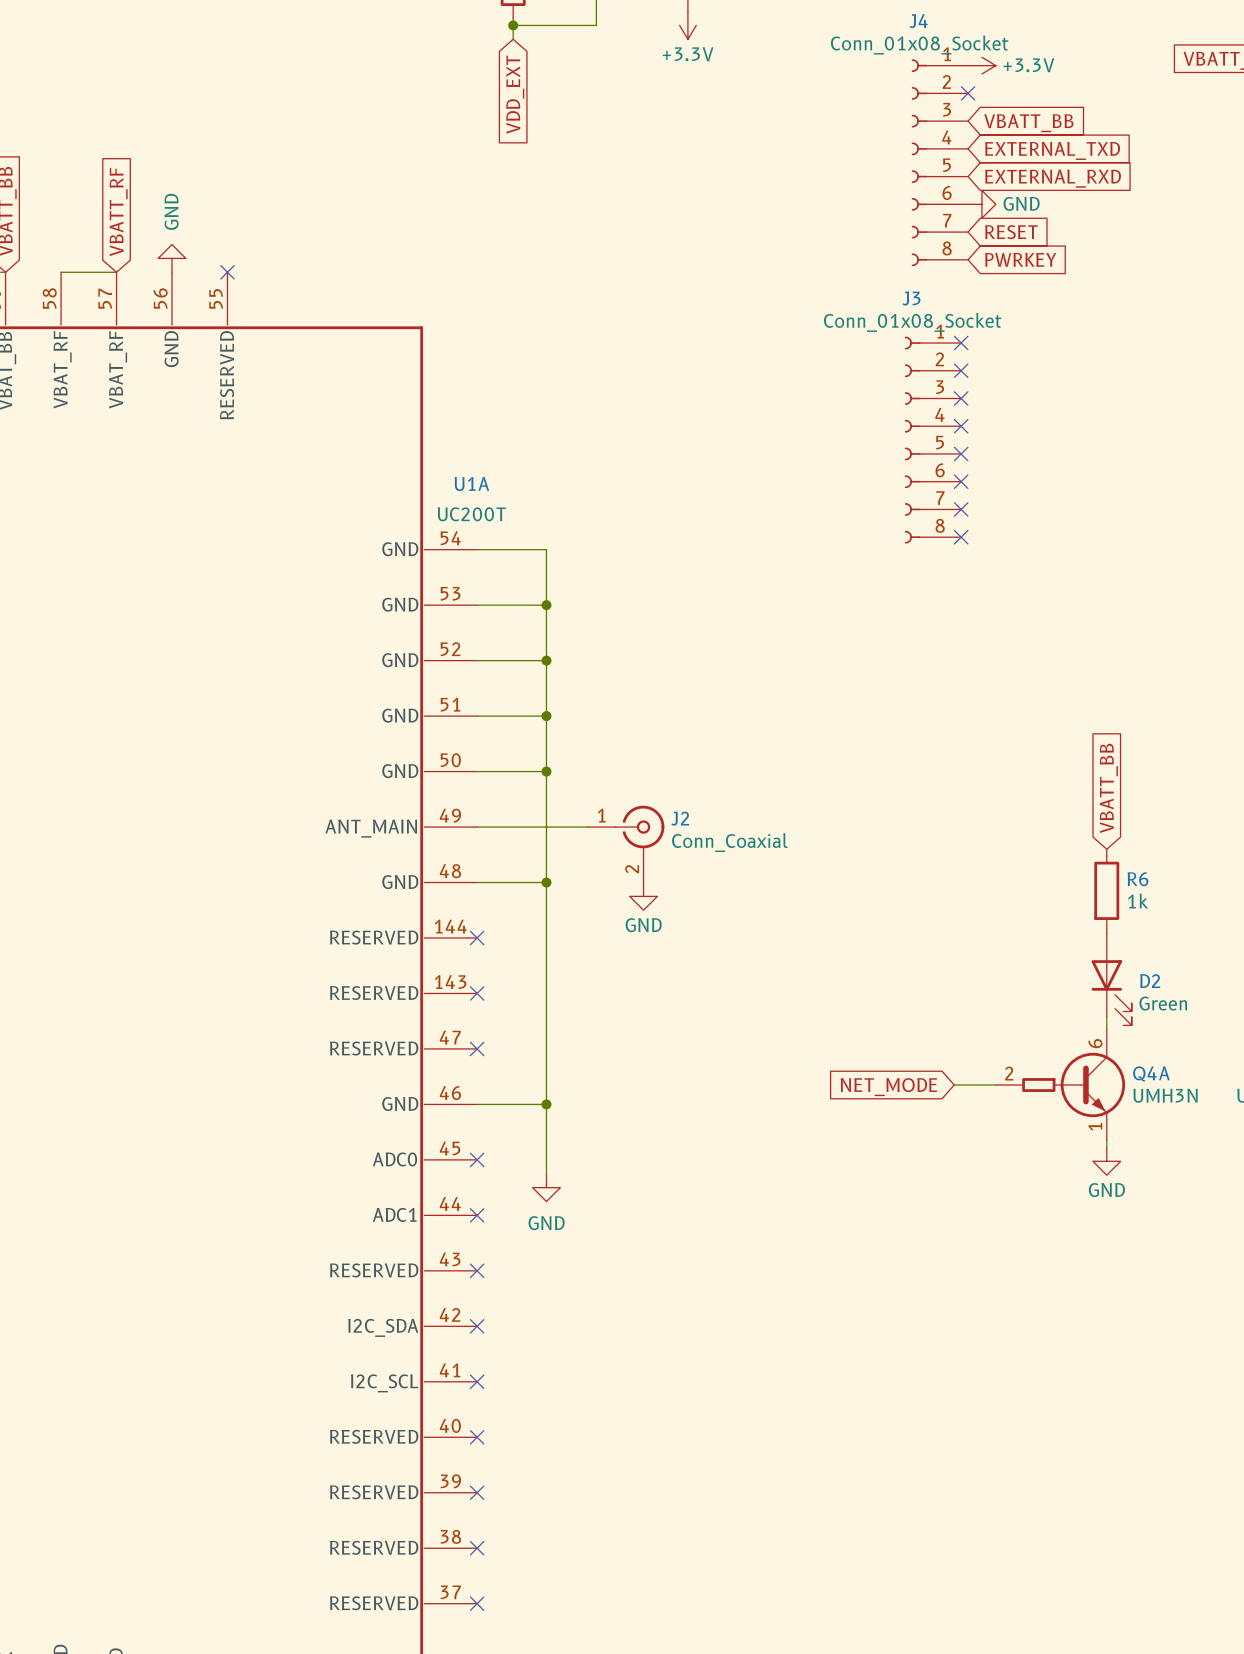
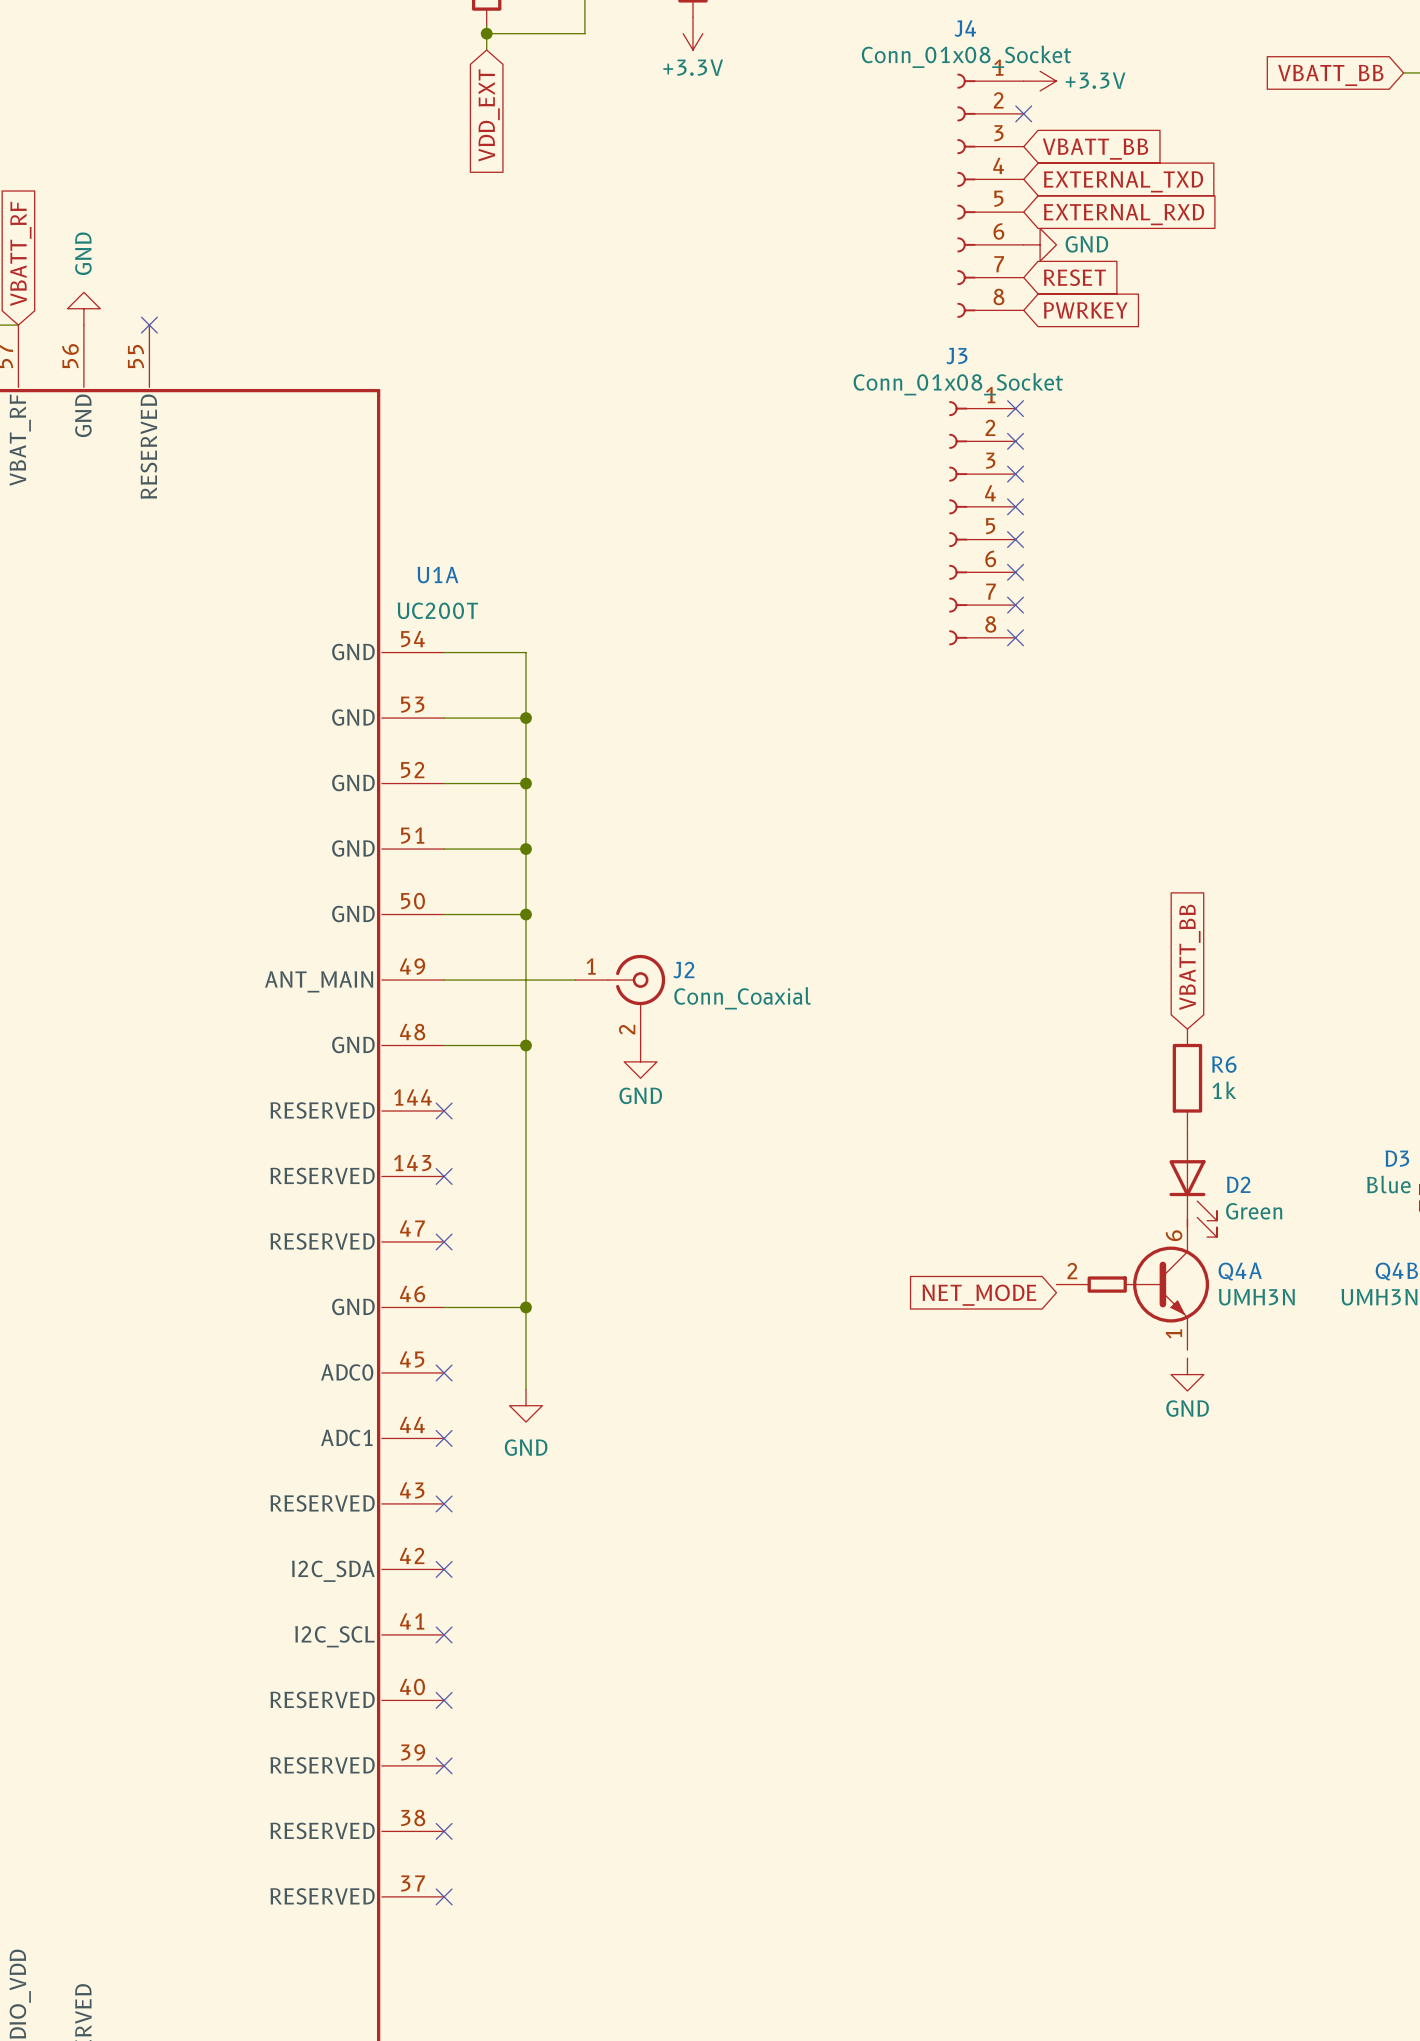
global label position: VBATT_BB (1108, 788) -> VBATT_BB (1189, 957)
R6 position: (1106, 890) -> (1187, 1078)
D2 position: (1111, 979) -> (1193, 1183)
wire: (954, 1085) (995, 1085) -> none
global label position: NET_MODE (888, 1087) -> NET_MODE (979, 1295)
wire: (1106, 1140) (1106, 1147) -> none

